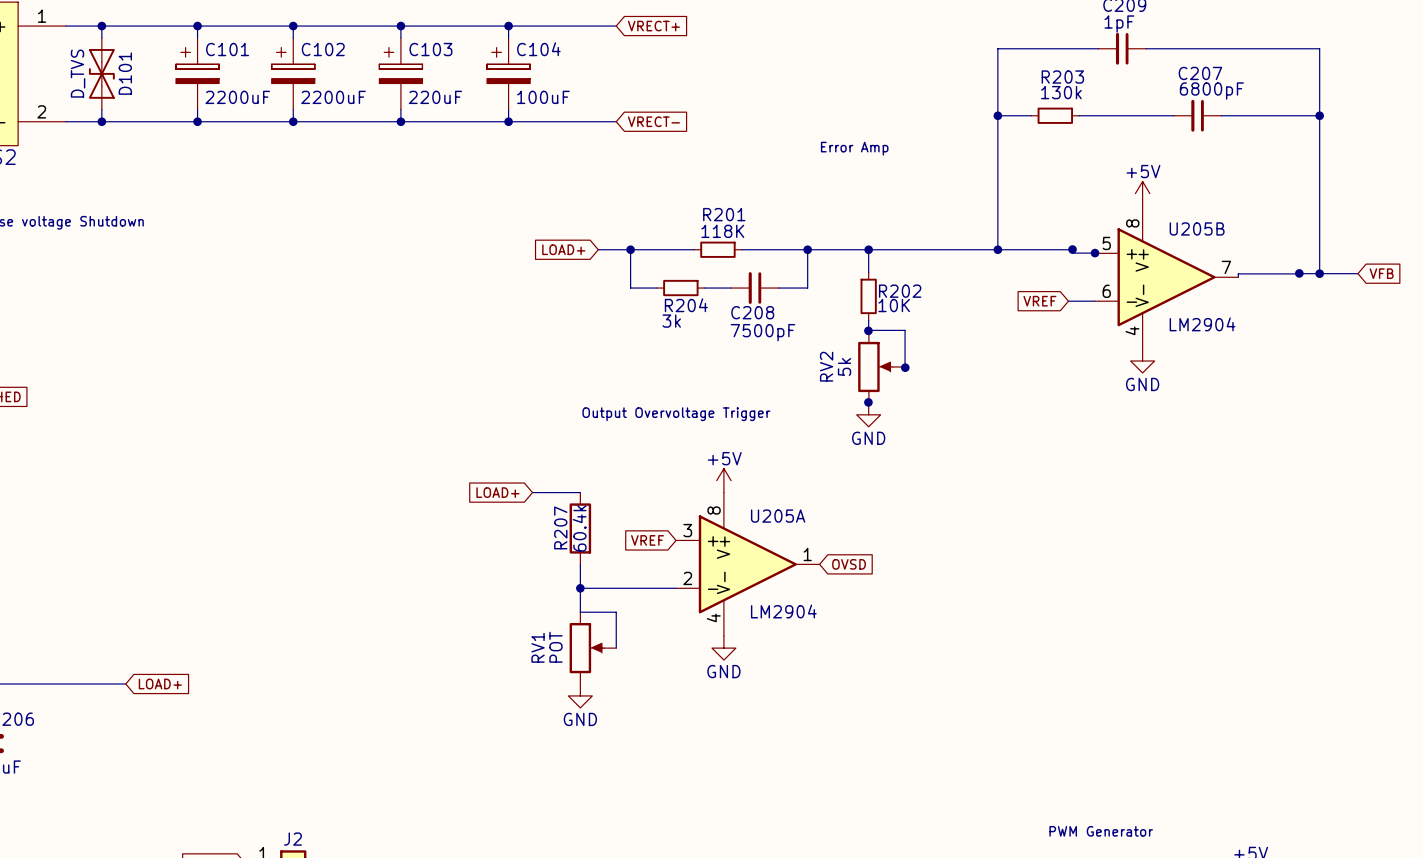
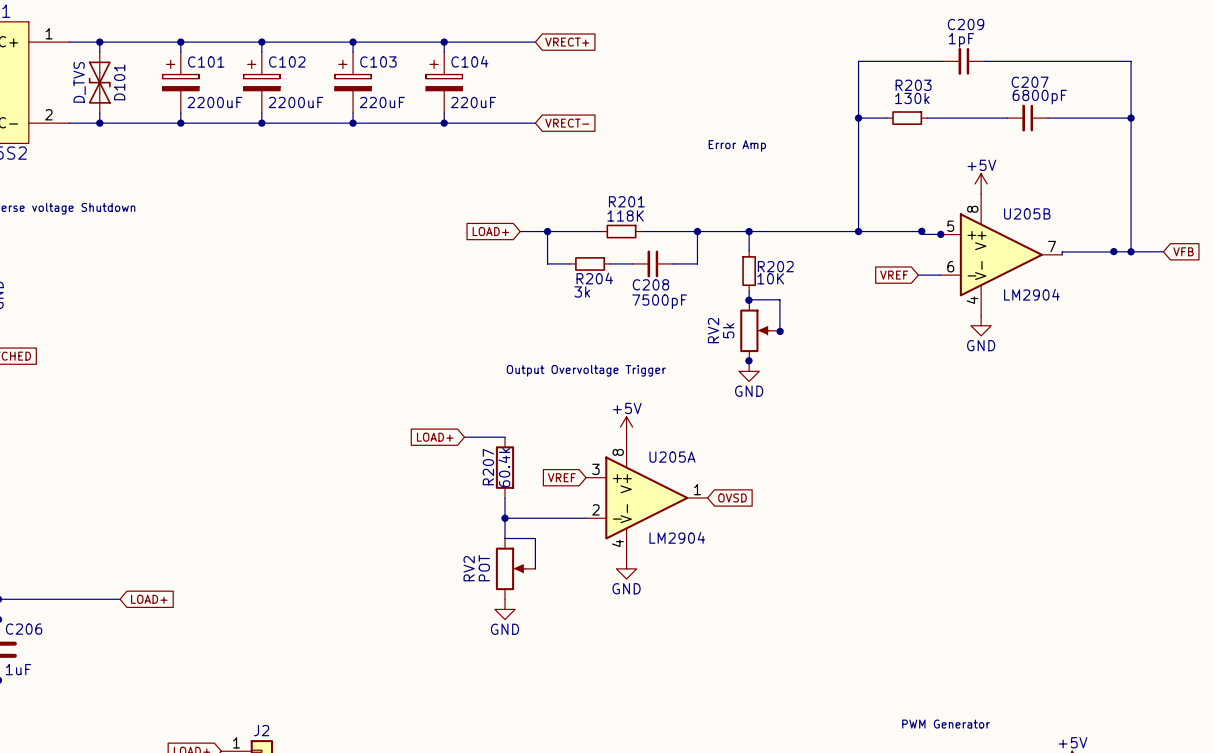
C104 value: 100uF (543, 97) -> 220uF (473, 102)
RV1 name: RV1 (538, 647) -> RV2 (469, 568)

